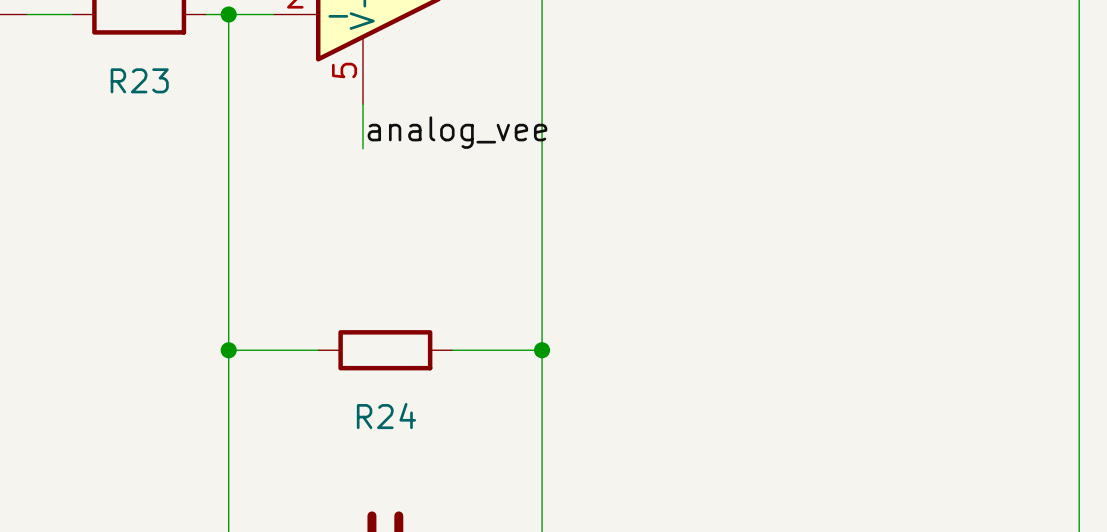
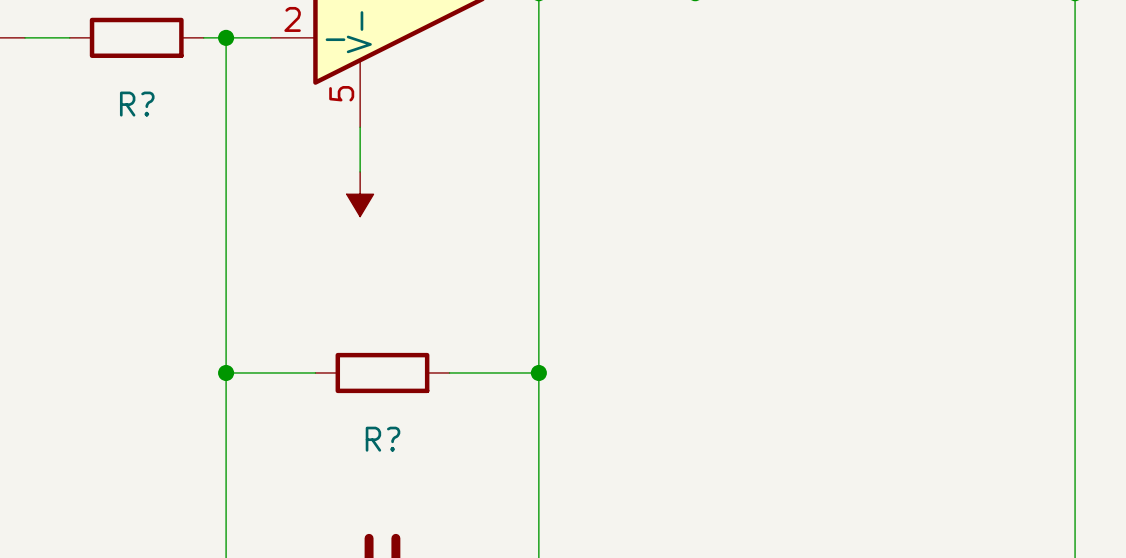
R23 name: R23 (139, 80) -> R? (137, 104)
label: analog_vee (457, 132) -> none
power symbol: none -> (360, 194)
R24 name: R24 (386, 416) -> R? (383, 439)

